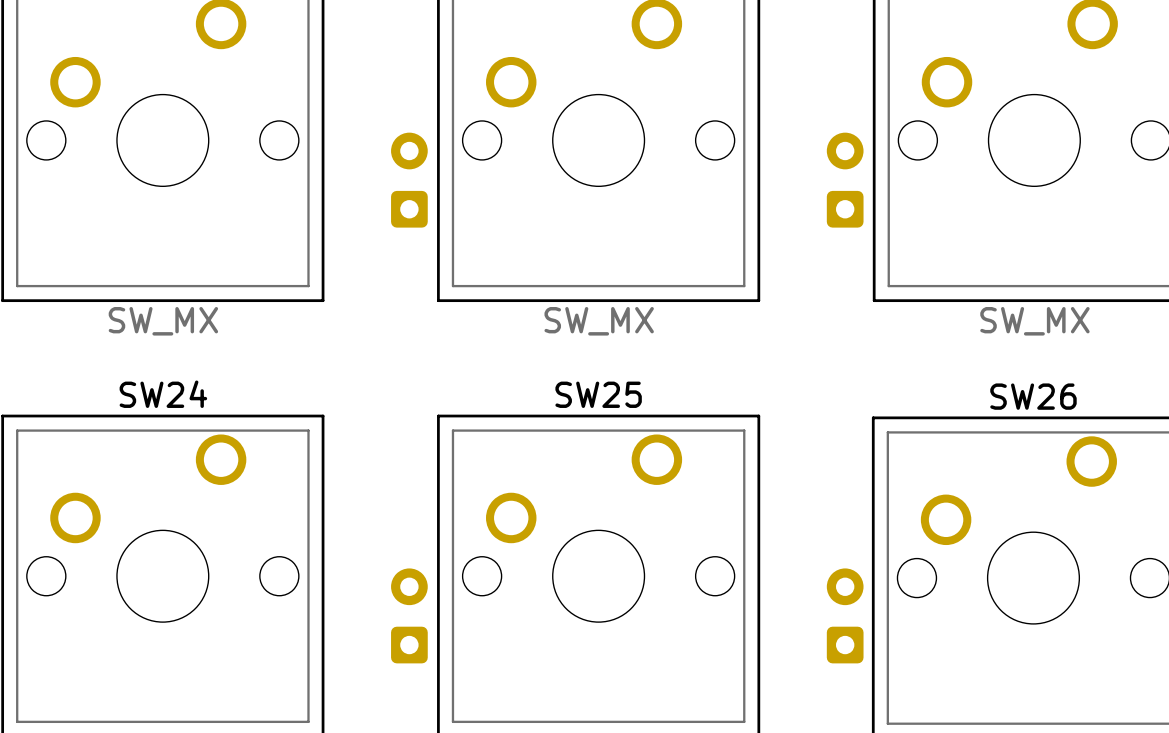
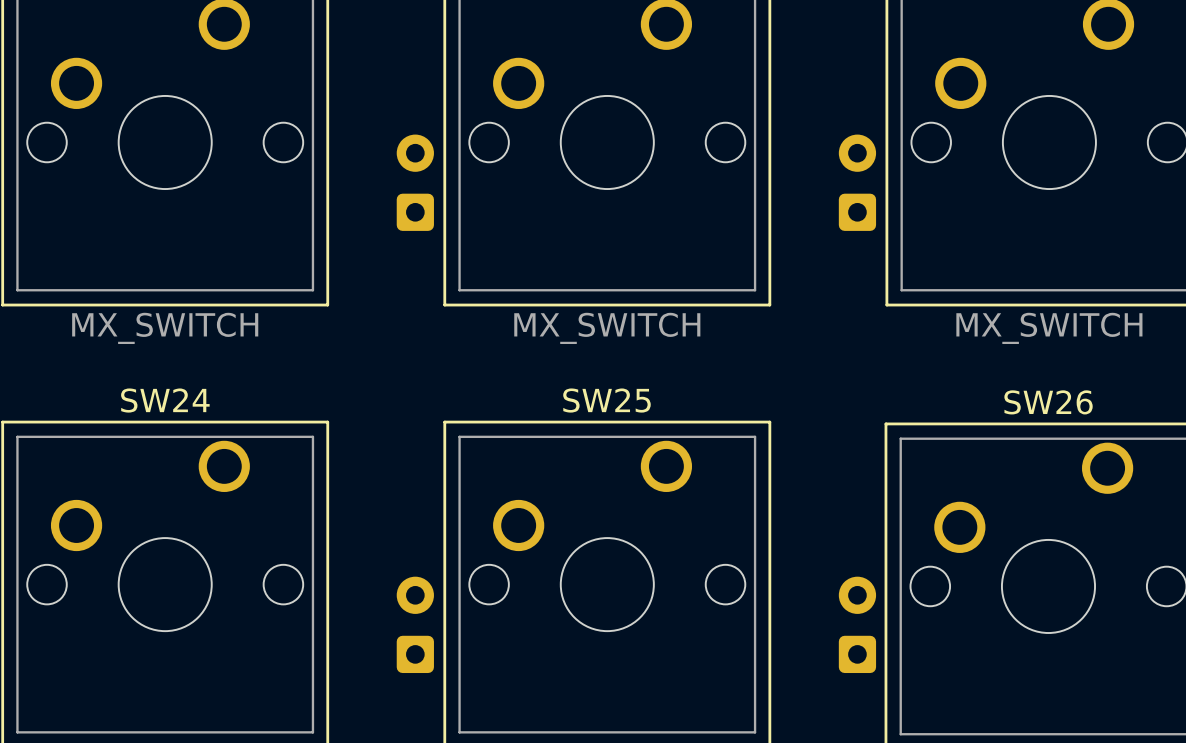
part value: SW_MX (163, 321) -> MX_SWITCH (165, 328)
part value: SW_MX (599, 321) -> MX_SWITCH (607, 328)
part value: SW_MX (1034, 321) -> MX_SWITCH (1049, 328)

